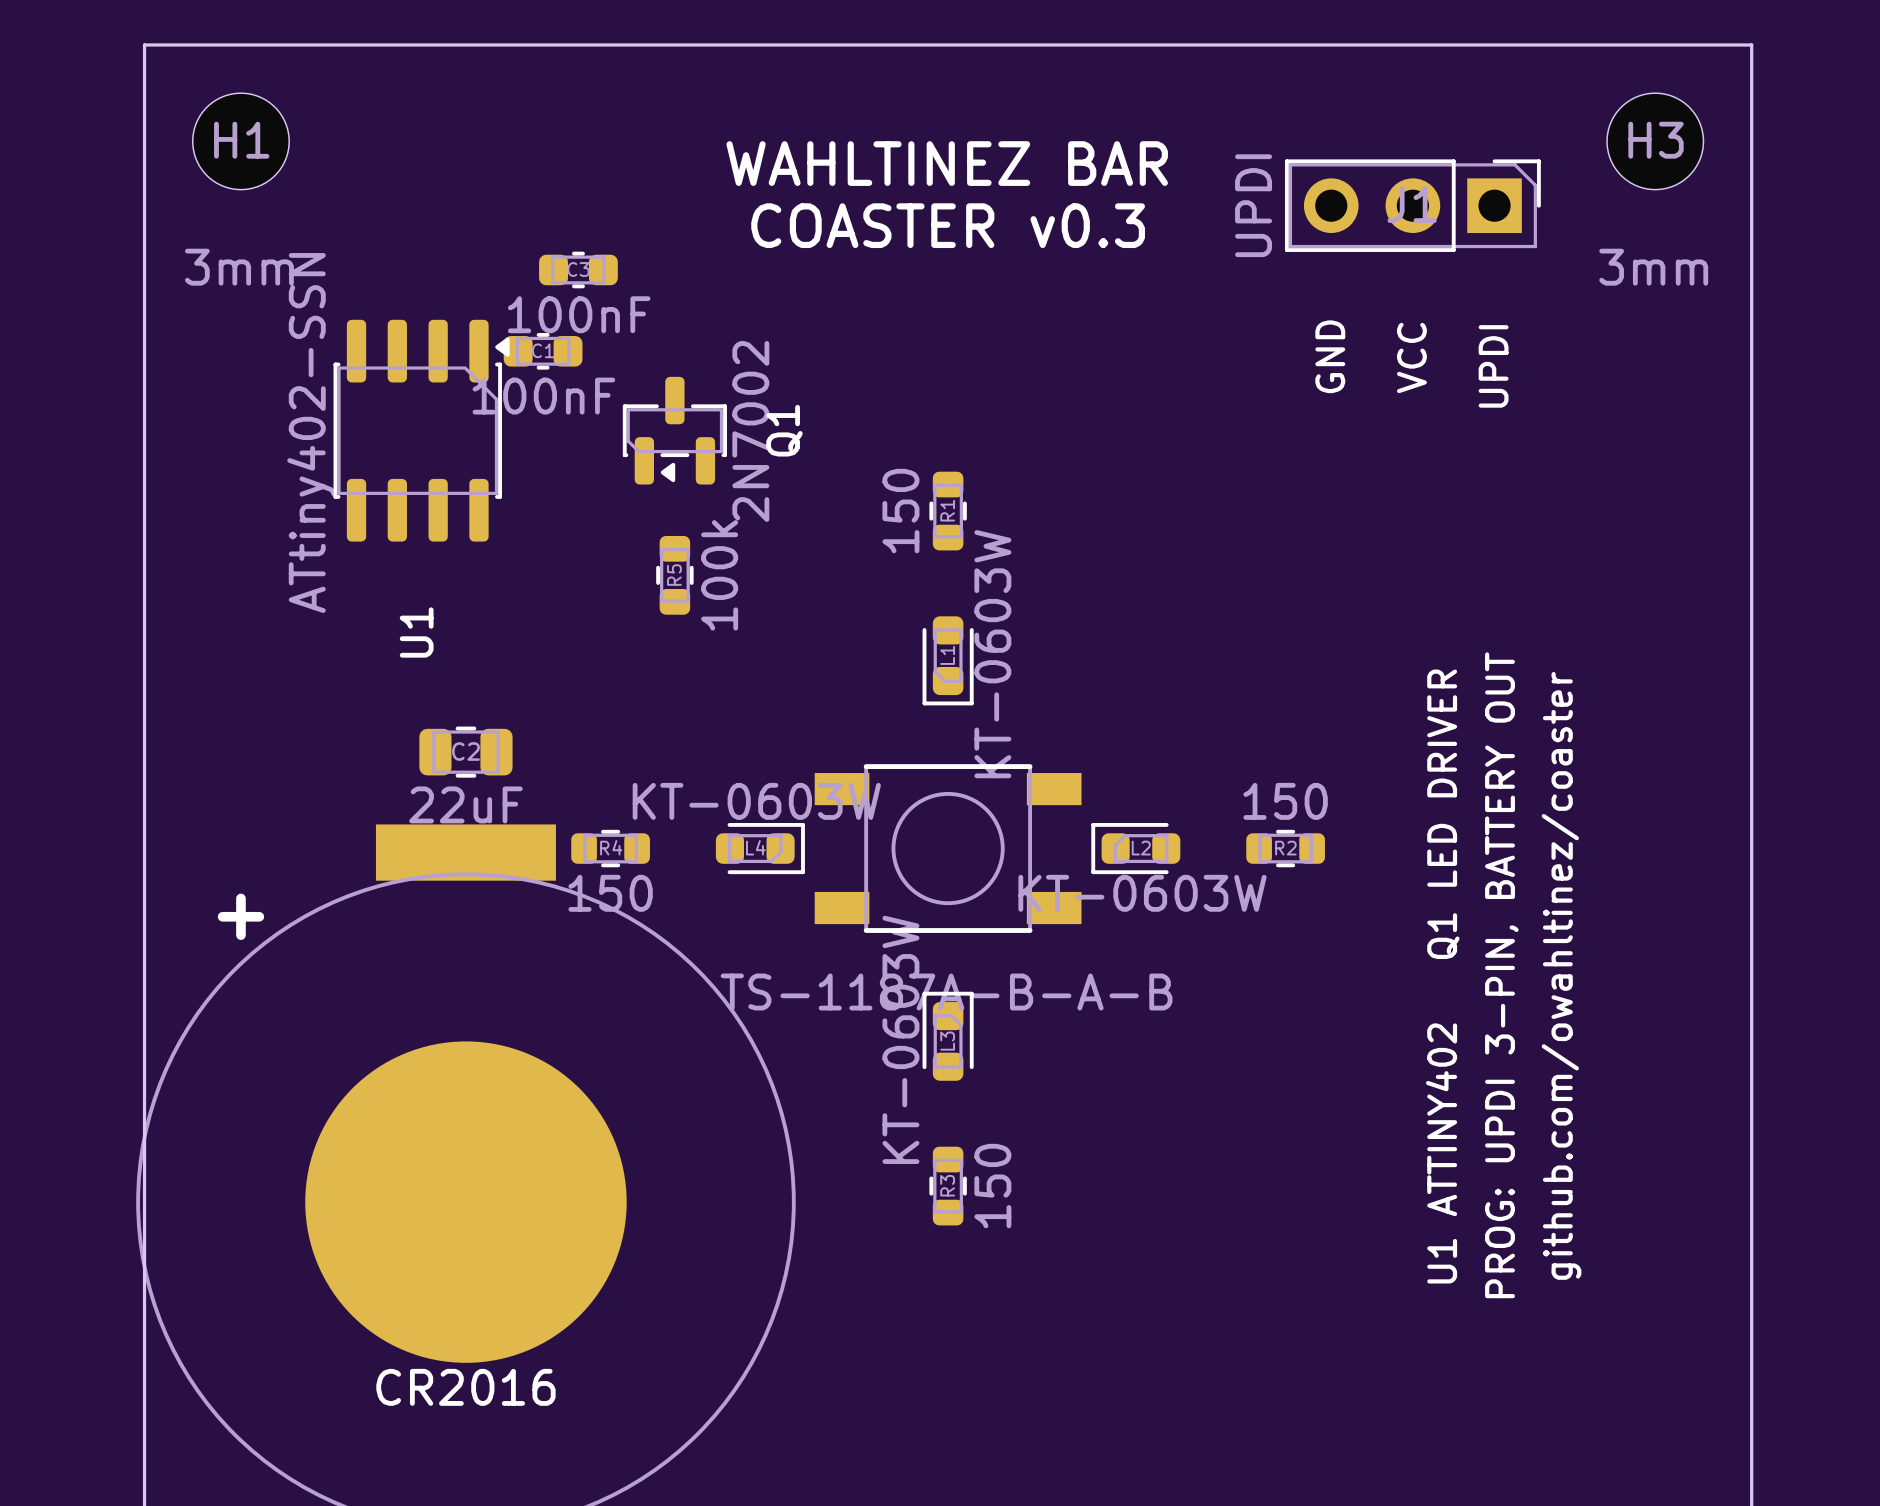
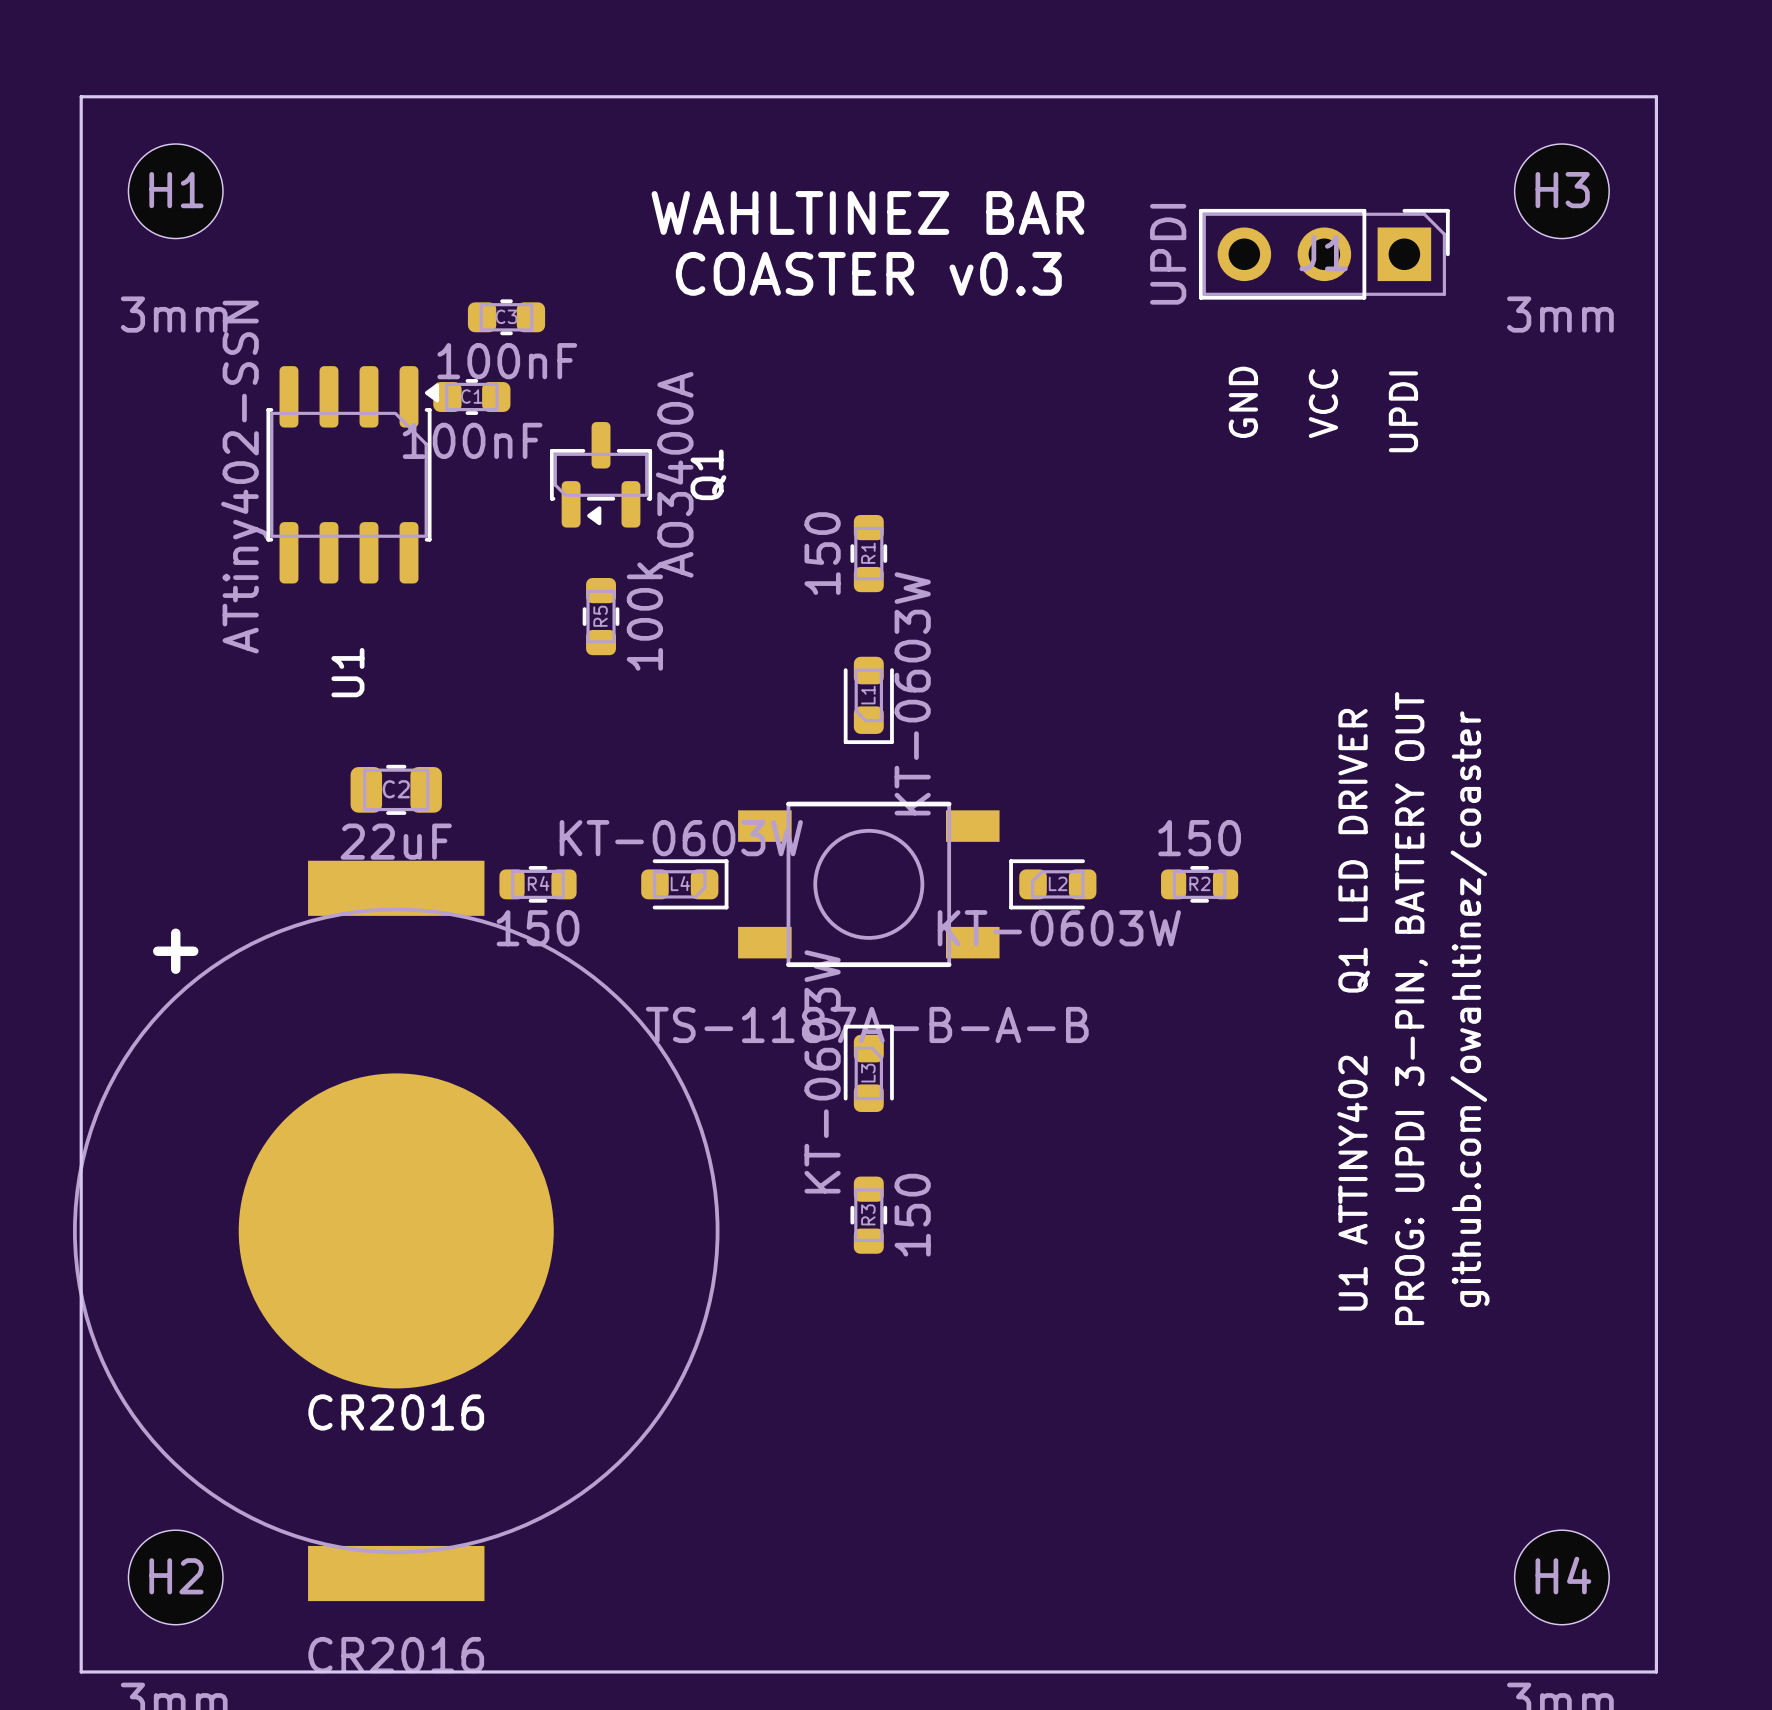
Q1 value: 2N7002 (750, 431) -> AO3400A (674, 474)

